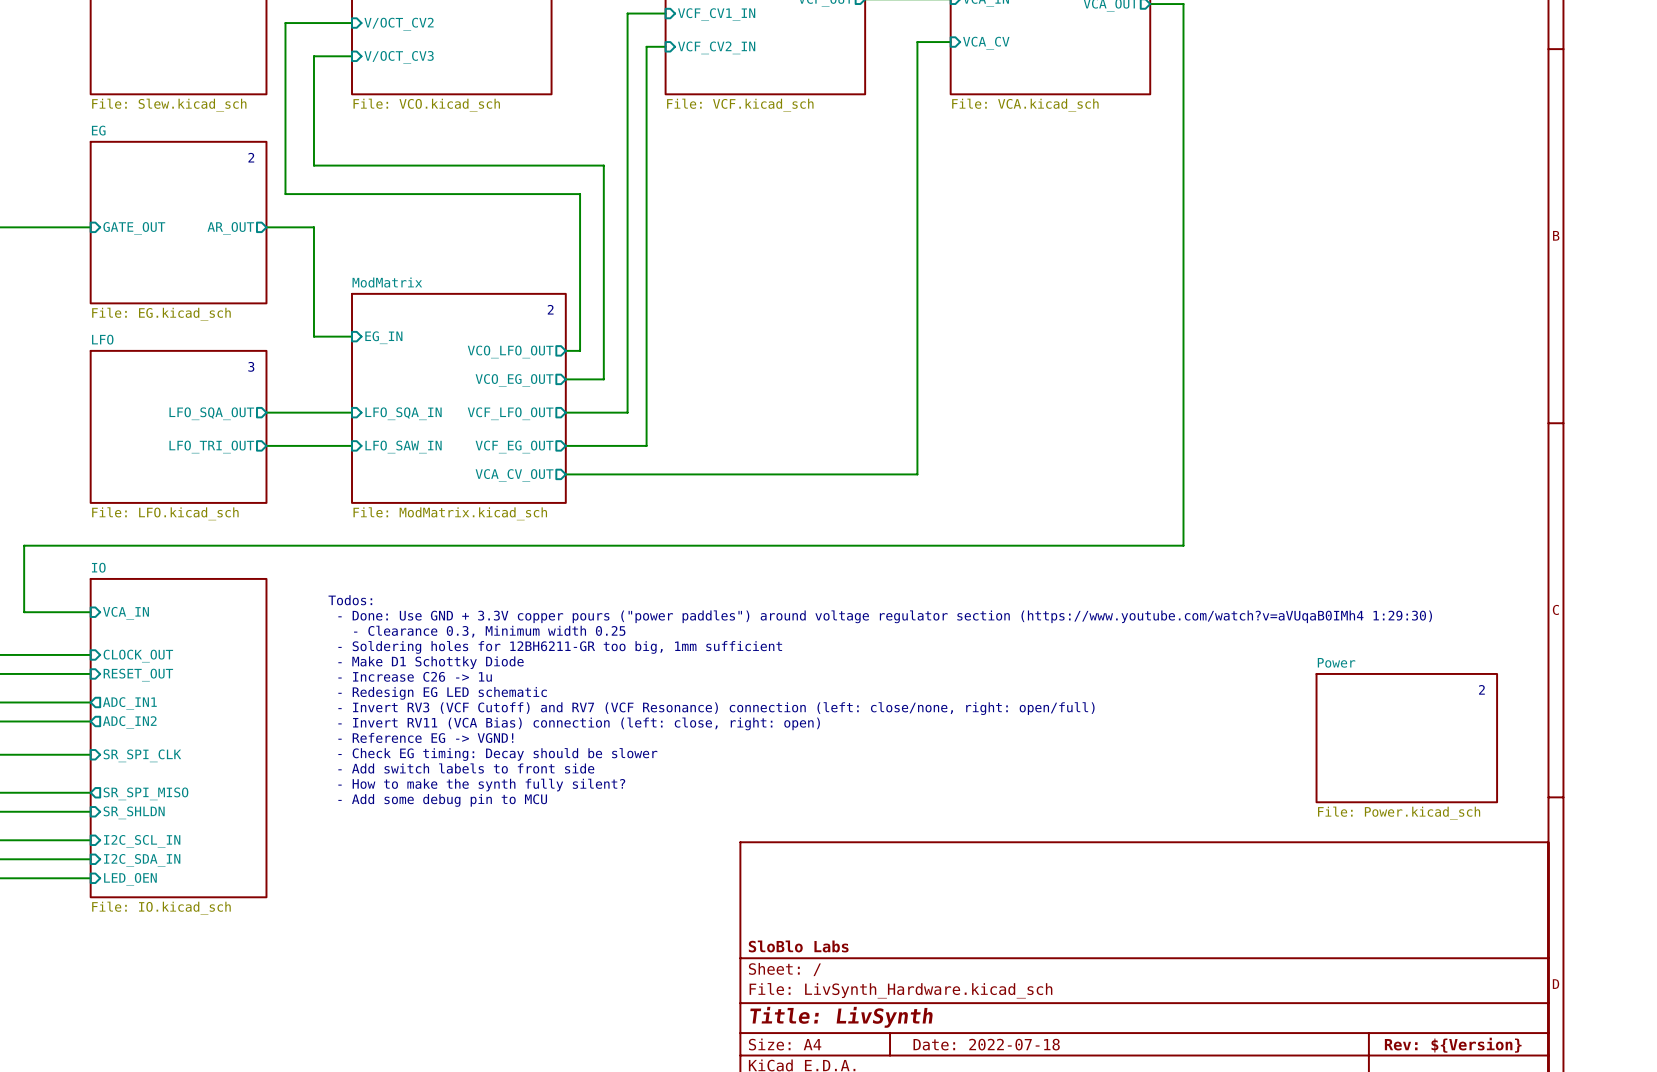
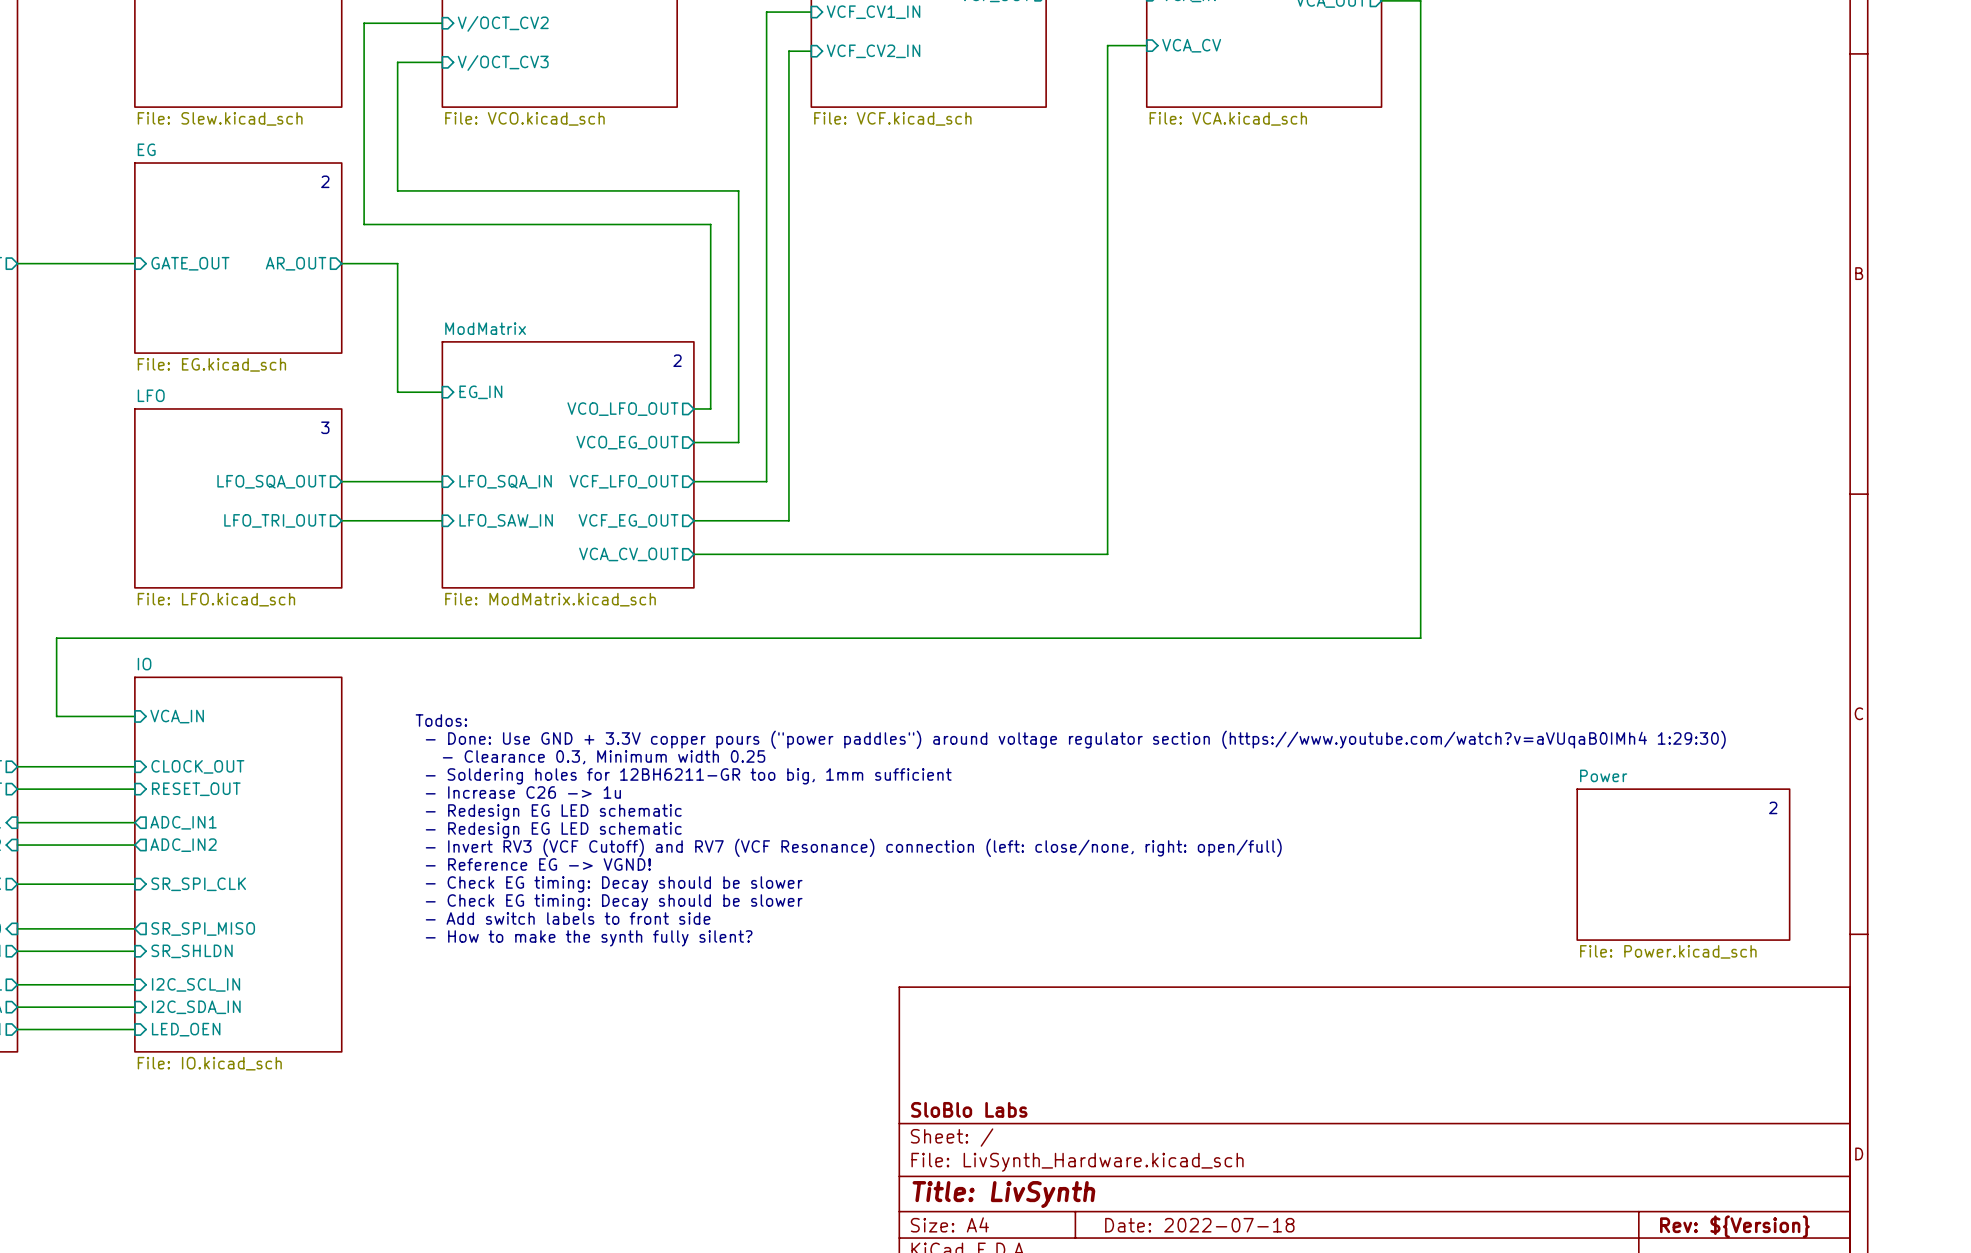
text: Todos: (350, 600) -> none
text: - Done: Use GND + 3.3V copper pours ("power paddles") around voltage regulator section (https://www.youtube.com/watch?v=aVUqaB0IMh4 1:29:30) (885, 616) -> Todos: (441, 720)
text: - Clearance 0.3, Minimum width 0.25 (489, 631) -> - Done: Use GND + 3.3V copper pours ("power paddles") around voltage regulator section (https://www.youtube.com/watch?v=aVUqaB0IMh4 1:29:30) (1075, 739)
text: - Soldering holes for 12BH6211-GR too big, 1mm sufficient (560, 647) -> - Clearance 0.3, Minimum width 0.25 (604, 757)
text: - Make D1 Schottky Diode (431, 662) -> - Soldering holes for 12BH6211-GR too big, 1mm sufficient (688, 776)
text: - Invert RV3 (VCF Cutoff) and RV7 (VCF Resonance) connection (left: close/none, right: open/full) (716, 708) -> - Redesign EG LED schematic (553, 830)
text: - Invert RV11 (VCA Bias) connection (left: close, right: open) (579, 723) -> - Invert RV3 (VCF Cutoff) and RV7 (VCF Resonance) connection (left: close/none, right: open/full) (853, 847)
text: - Add switch labels to front side (466, 768) -> - Check EG timing: Decay should be slower (614, 902)
text: - How to make the synth fully silent? (481, 785) -> - Add switch labels to front side (568, 918)
text: - Add some debug pin to MCU (442, 800) -> - How to make the synth fully silent? (589, 938)

